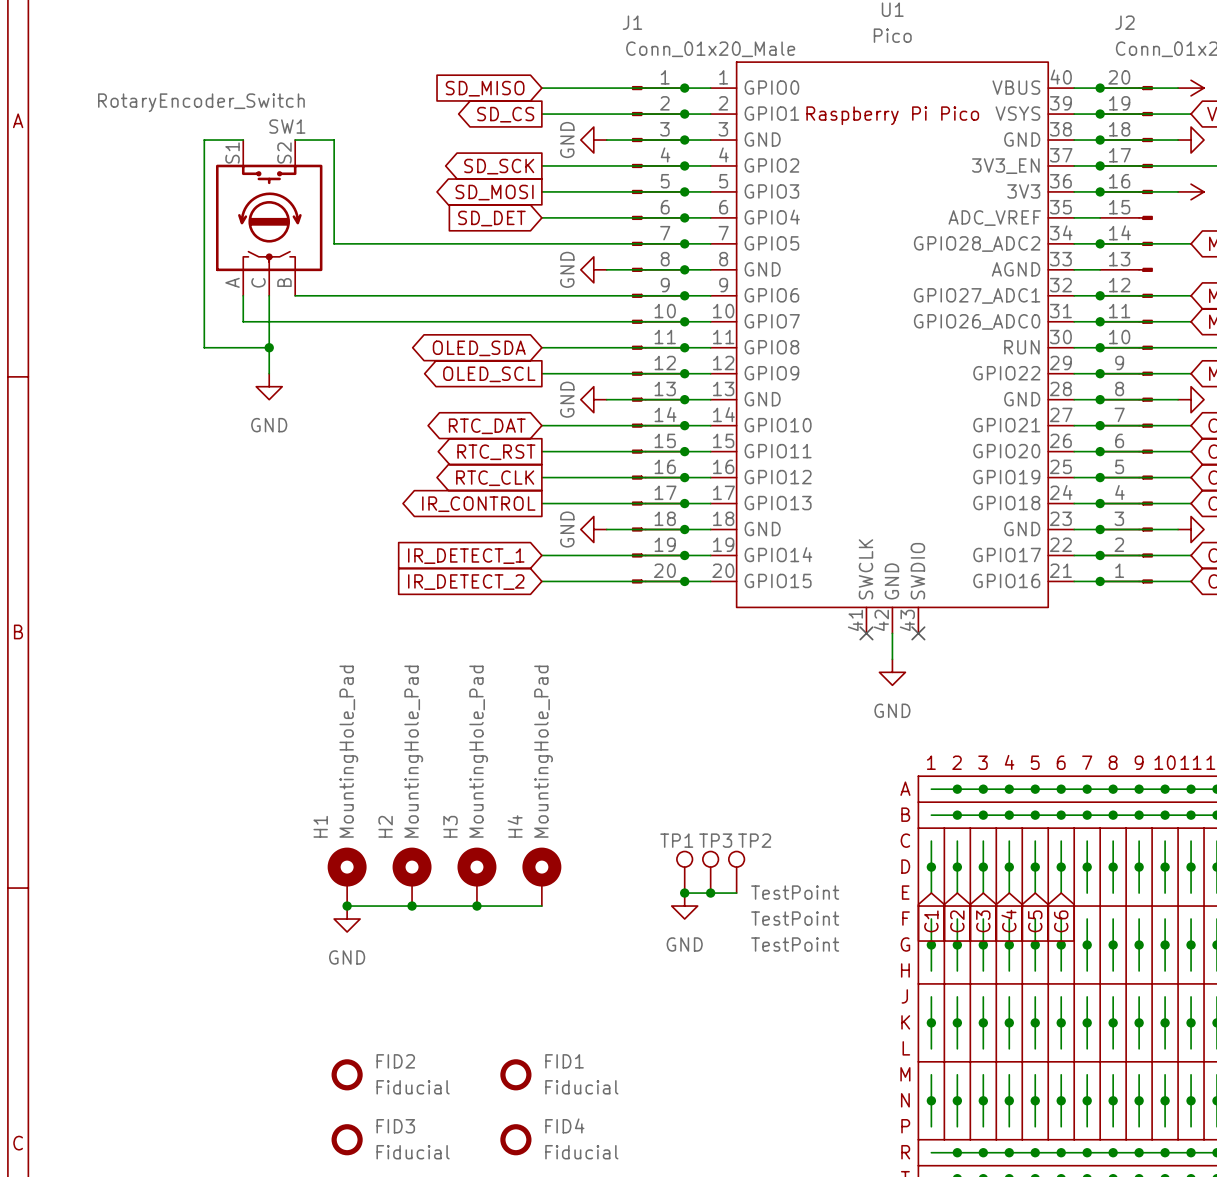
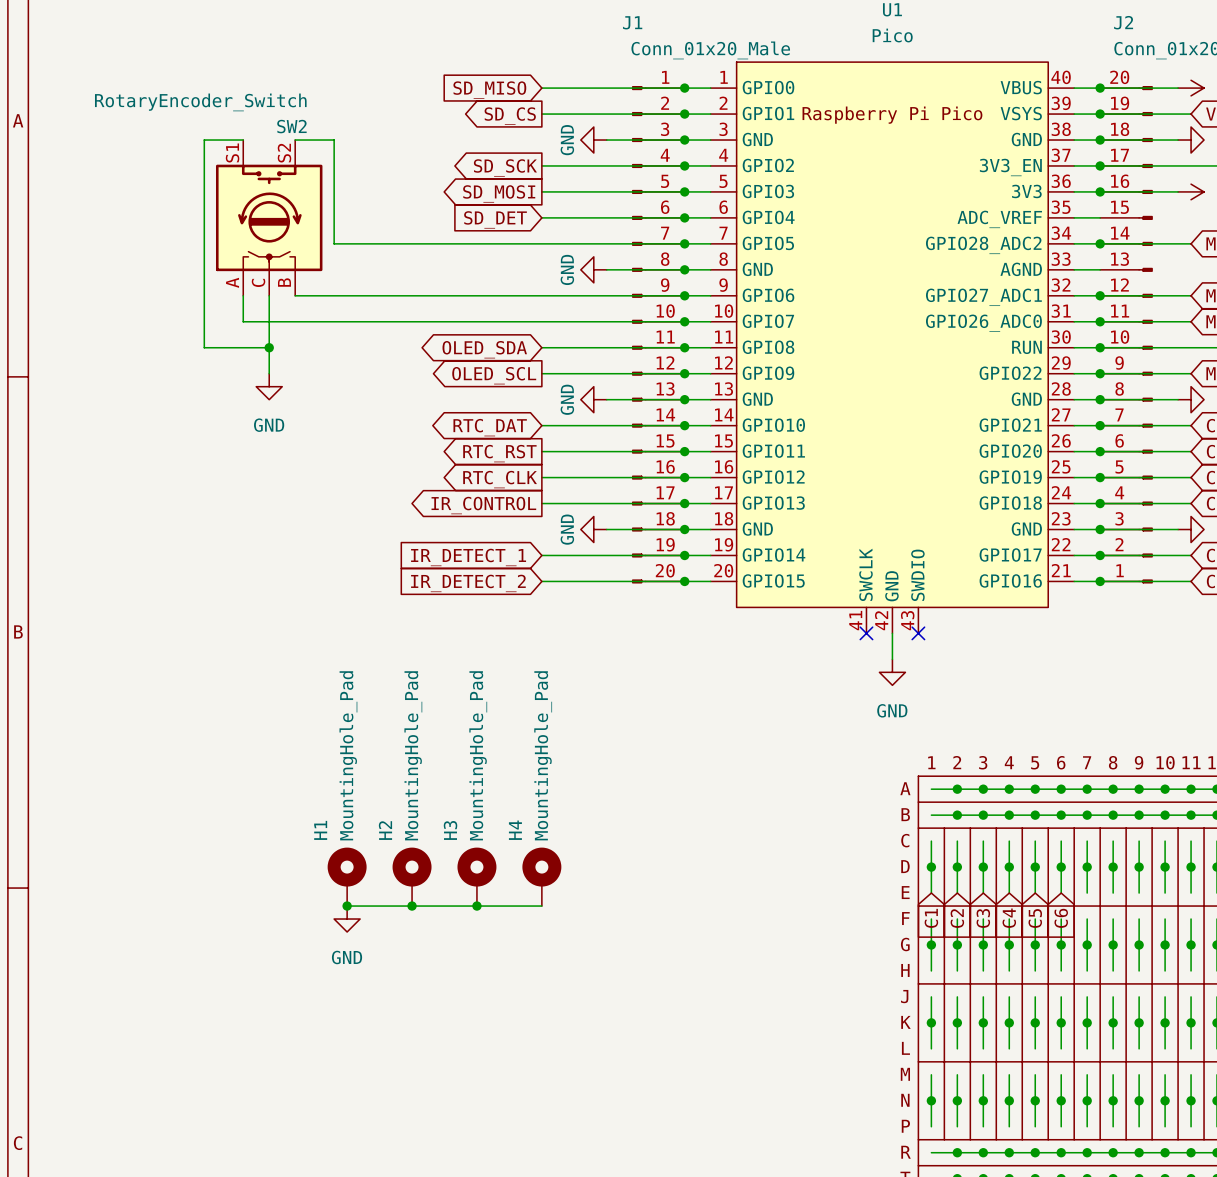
SW1 name: SW1 (287, 126) -> SW2 (291, 126)
TP1: TestPoint (684, 872) -> none
TP3: TestPoint (710, 872) -> none
TP2: TestPoint (736, 872) -> none
wire: (684, 893) (736, 893) -> none
junction: (684, 893) -> none
junction: (710, 893) -> none
power symbol: GND (684, 906) -> none
FID2: Fiducial (347, 1074) -> none
FID1: Fiducial (515, 1074) -> none
FID3: Fiducial (347, 1139) -> none
FID4: Fiducial (515, 1139) -> none

